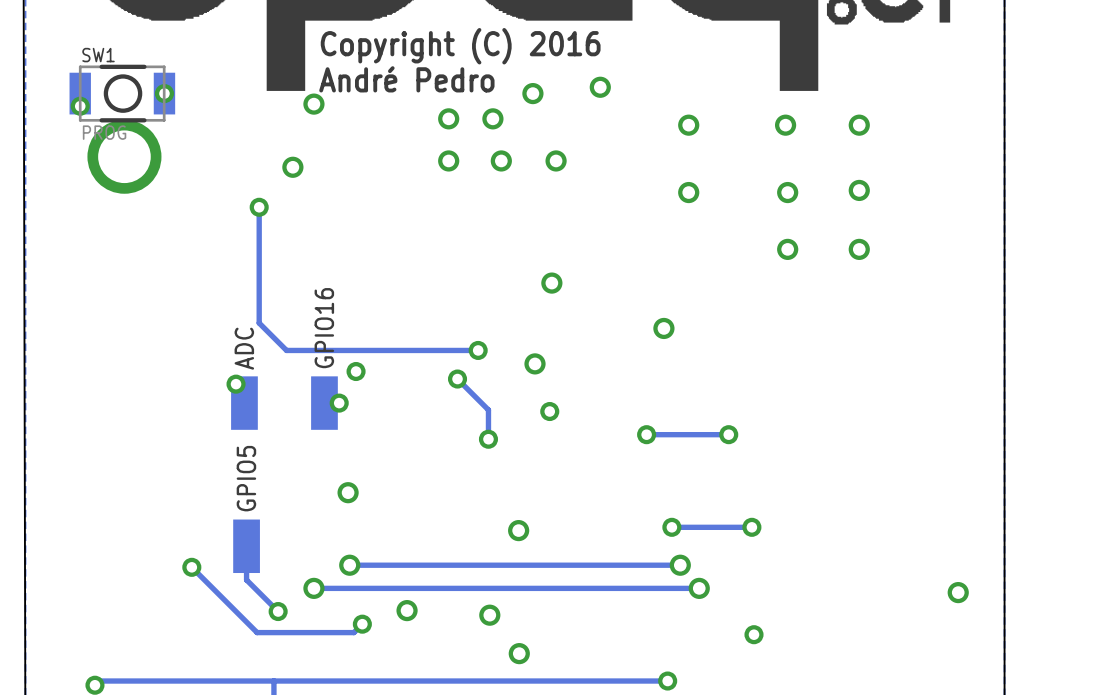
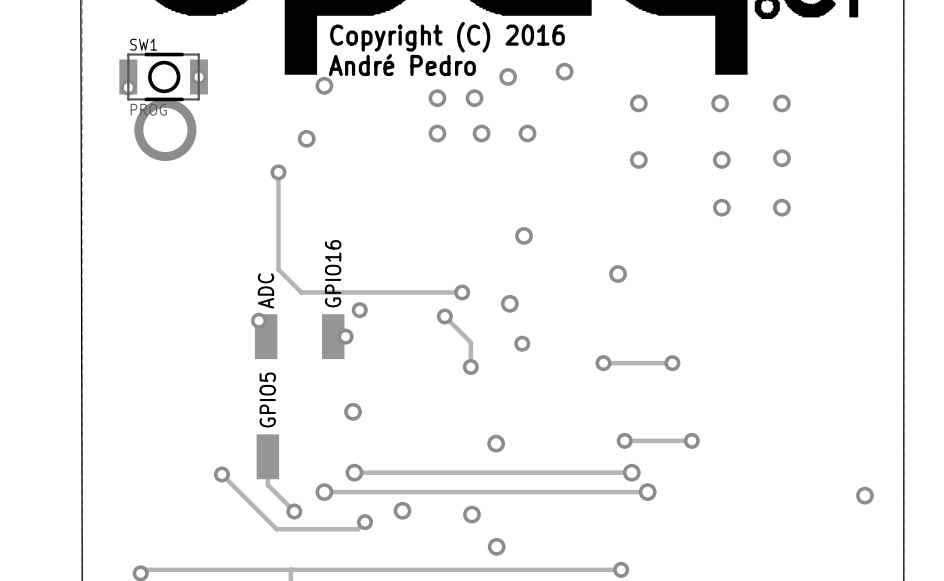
via: (754, 634) -> none

